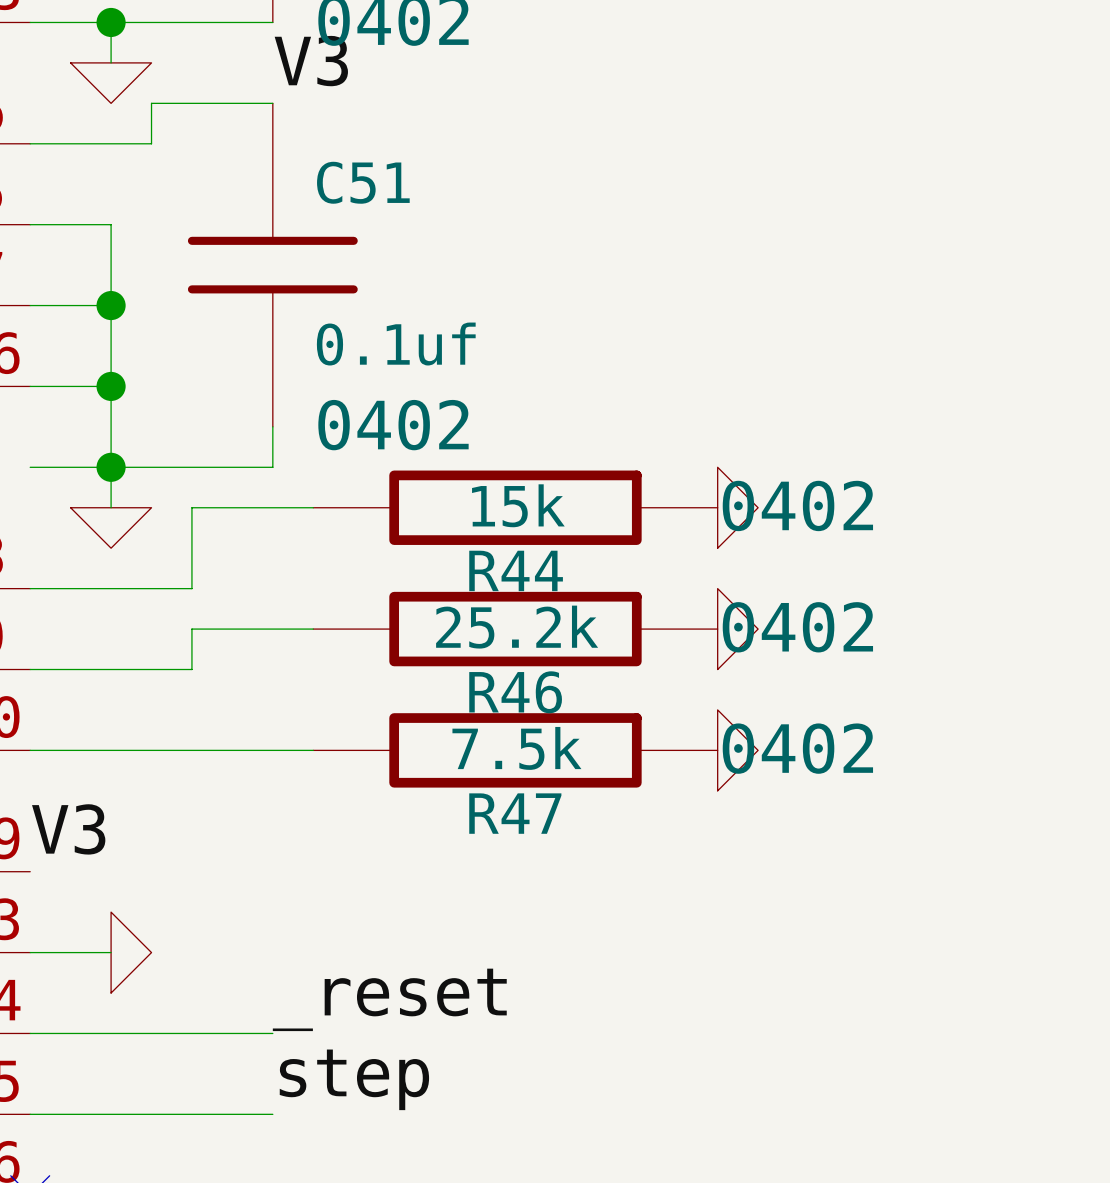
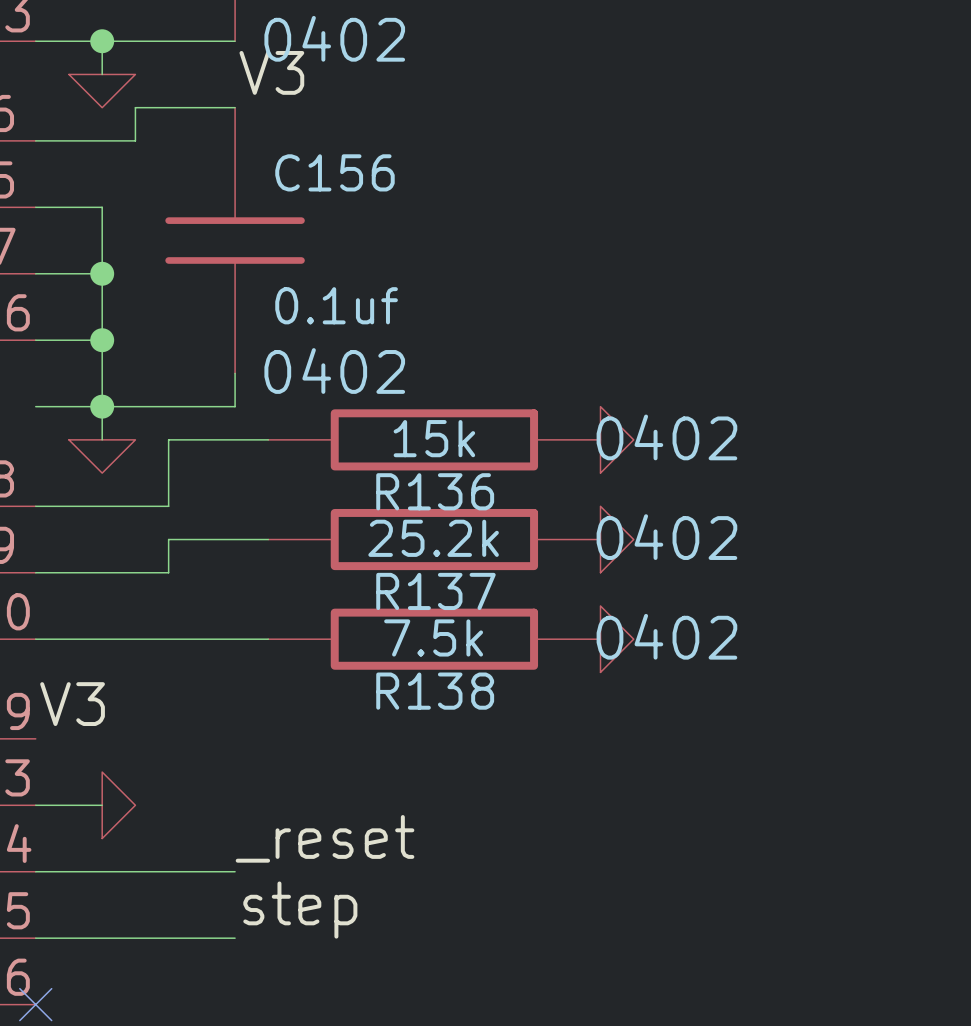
C51 name: C51 (363, 182) -> C156 (334, 172)
R44 name: R44 (516, 570) -> R136 (435, 491)
R46 name: R46 (515, 692) -> R137 (435, 591)
R47 name: R47 (515, 813) -> R138 (435, 691)

